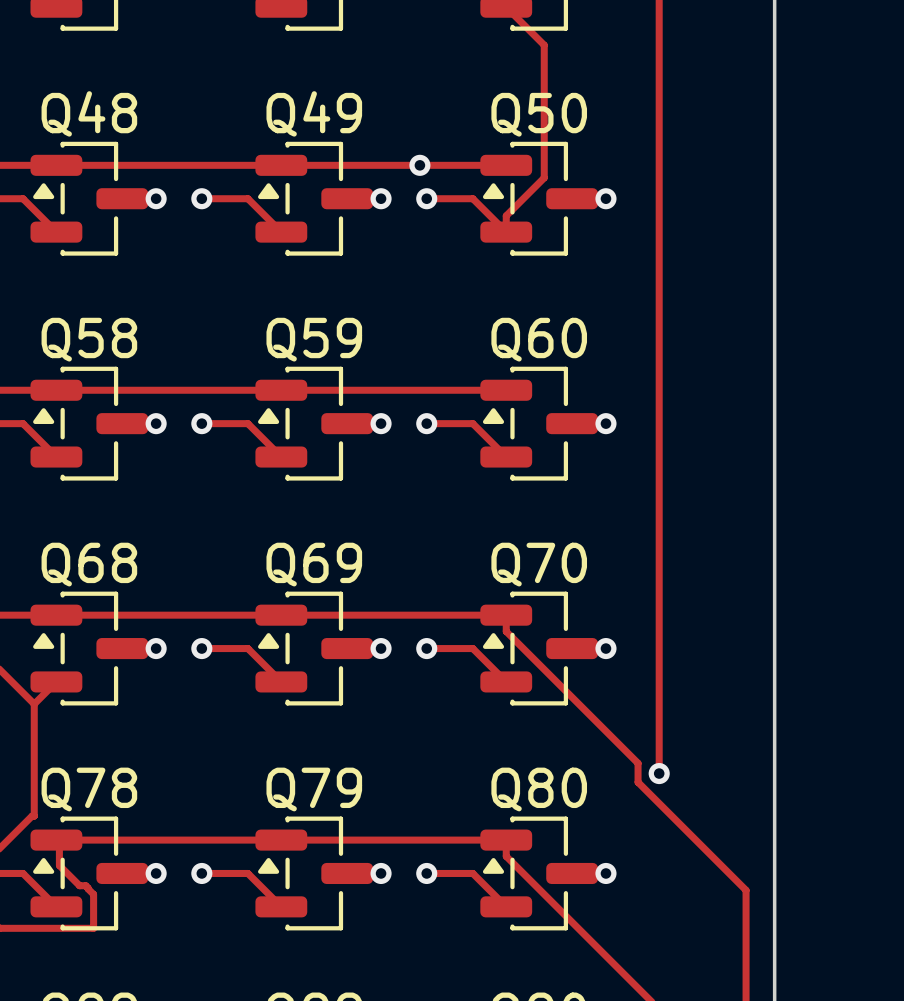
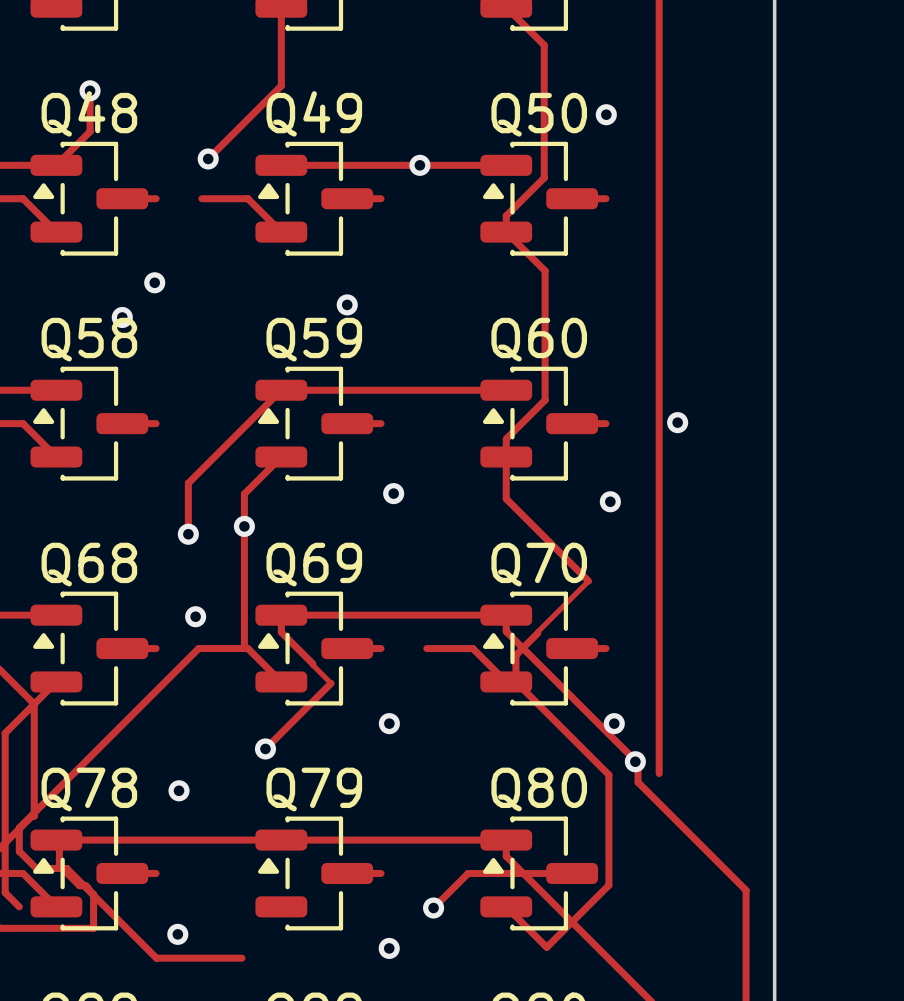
track: none -> (281, 7) (281, 85) (208, 158)
via: none -> (90, 90)
via: none -> (606, 114)
via: none -> (208, 158)
track: (56, 165) (281, 165) -> (56, 165) (90, 131) (90, 90)
via: (156, 198) -> none
via: (201, 198) -> none
via: (381, 198) -> none
track: (426, 198) (472, 198) (506, 232) -> (506, 906) (546, 947) (608, 885) (608, 774) (515, 681) (515, 655) (588, 581) (506, 498) (506, 439) (545, 400) (545, 270) (506, 232)
via: (426, 198) -> none
via: (605, 198) -> none
via: none -> (154, 282)
via: none -> (347, 304)
via: none -> (122, 317)
track: (56, 390) (281, 390) -> (188, 534) (188, 483) (281, 390)
via: none -> (677, 422)
via: (156, 423) -> none
track: (201, 423) (247, 423) (281, 457) -> (244, 648) (244, 493) (281, 457)
via: (201, 423) -> none
via: (381, 423) -> none
track: (426, 423) (472, 423) (506, 457) -> none
via: (426, 423) -> none
via: (605, 423) -> none
via: none -> (393, 493)
via: none -> (610, 501)
via: none -> (244, 526)
via: none -> (188, 534)
track: (56, 615) (281, 615) -> (265, 748) (331, 683) (281, 632) (281, 615)
via: none -> (195, 616)
via: (156, 648) -> none
track: none -> (201, 648) (198, 648) (19, 827) (19, 851) (36, 868) (66, 868) (156, 958) (242, 958)
via: (201, 648) -> none
via: (381, 648) -> none
via: (426, 648) -> none
via: (605, 648) -> none
track: none -> (34, 704) (5, 733) (5, 892) (19, 906)
via: none -> (389, 723)
via: none -> (614, 723)
via: none -> (265, 748)
via position: (659, 773) -> (635, 761)
via: none -> (179, 790)
via: (156, 873) -> none
track: (201, 873) (247, 873) (281, 906) -> none
via: (201, 873) -> none
via: (381, 873) -> none
track: (426, 873) (468, 873) -> (433, 908) (468, 873)
via: (426, 873) -> none
track: (472, 873) (506, 906) -> (472, 873) (572, 873)
via: (605, 873) -> none
via: none -> (433, 908)
via: none -> (177, 934)
via: none -> (389, 948)

